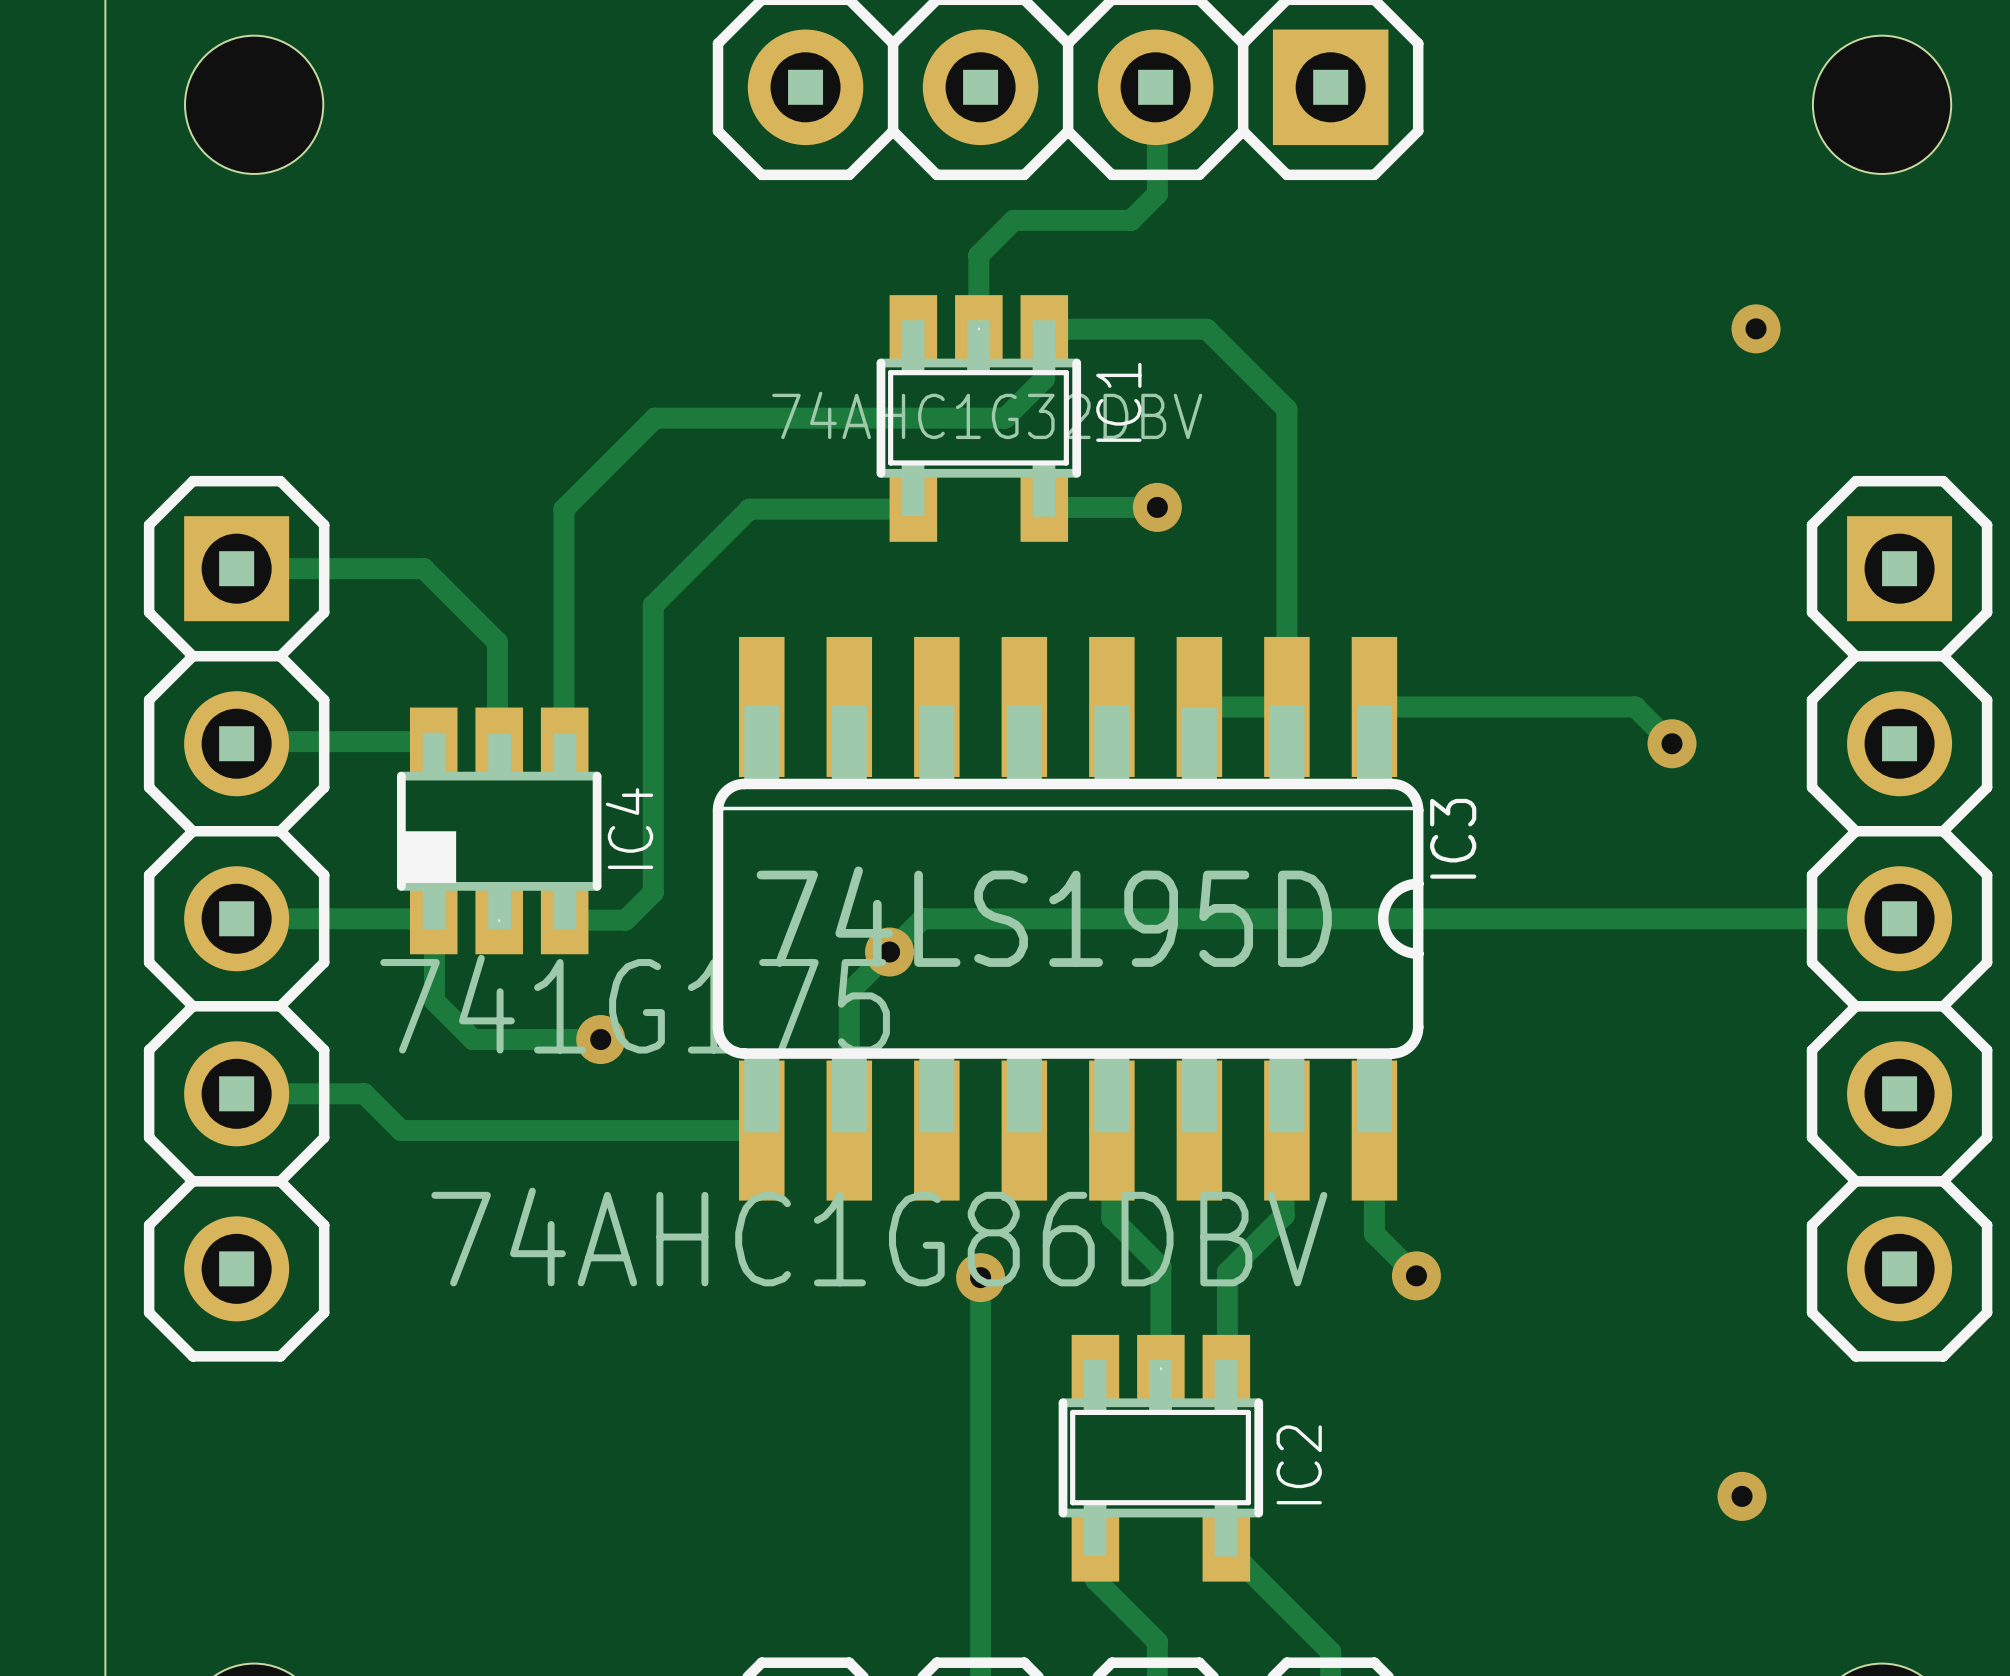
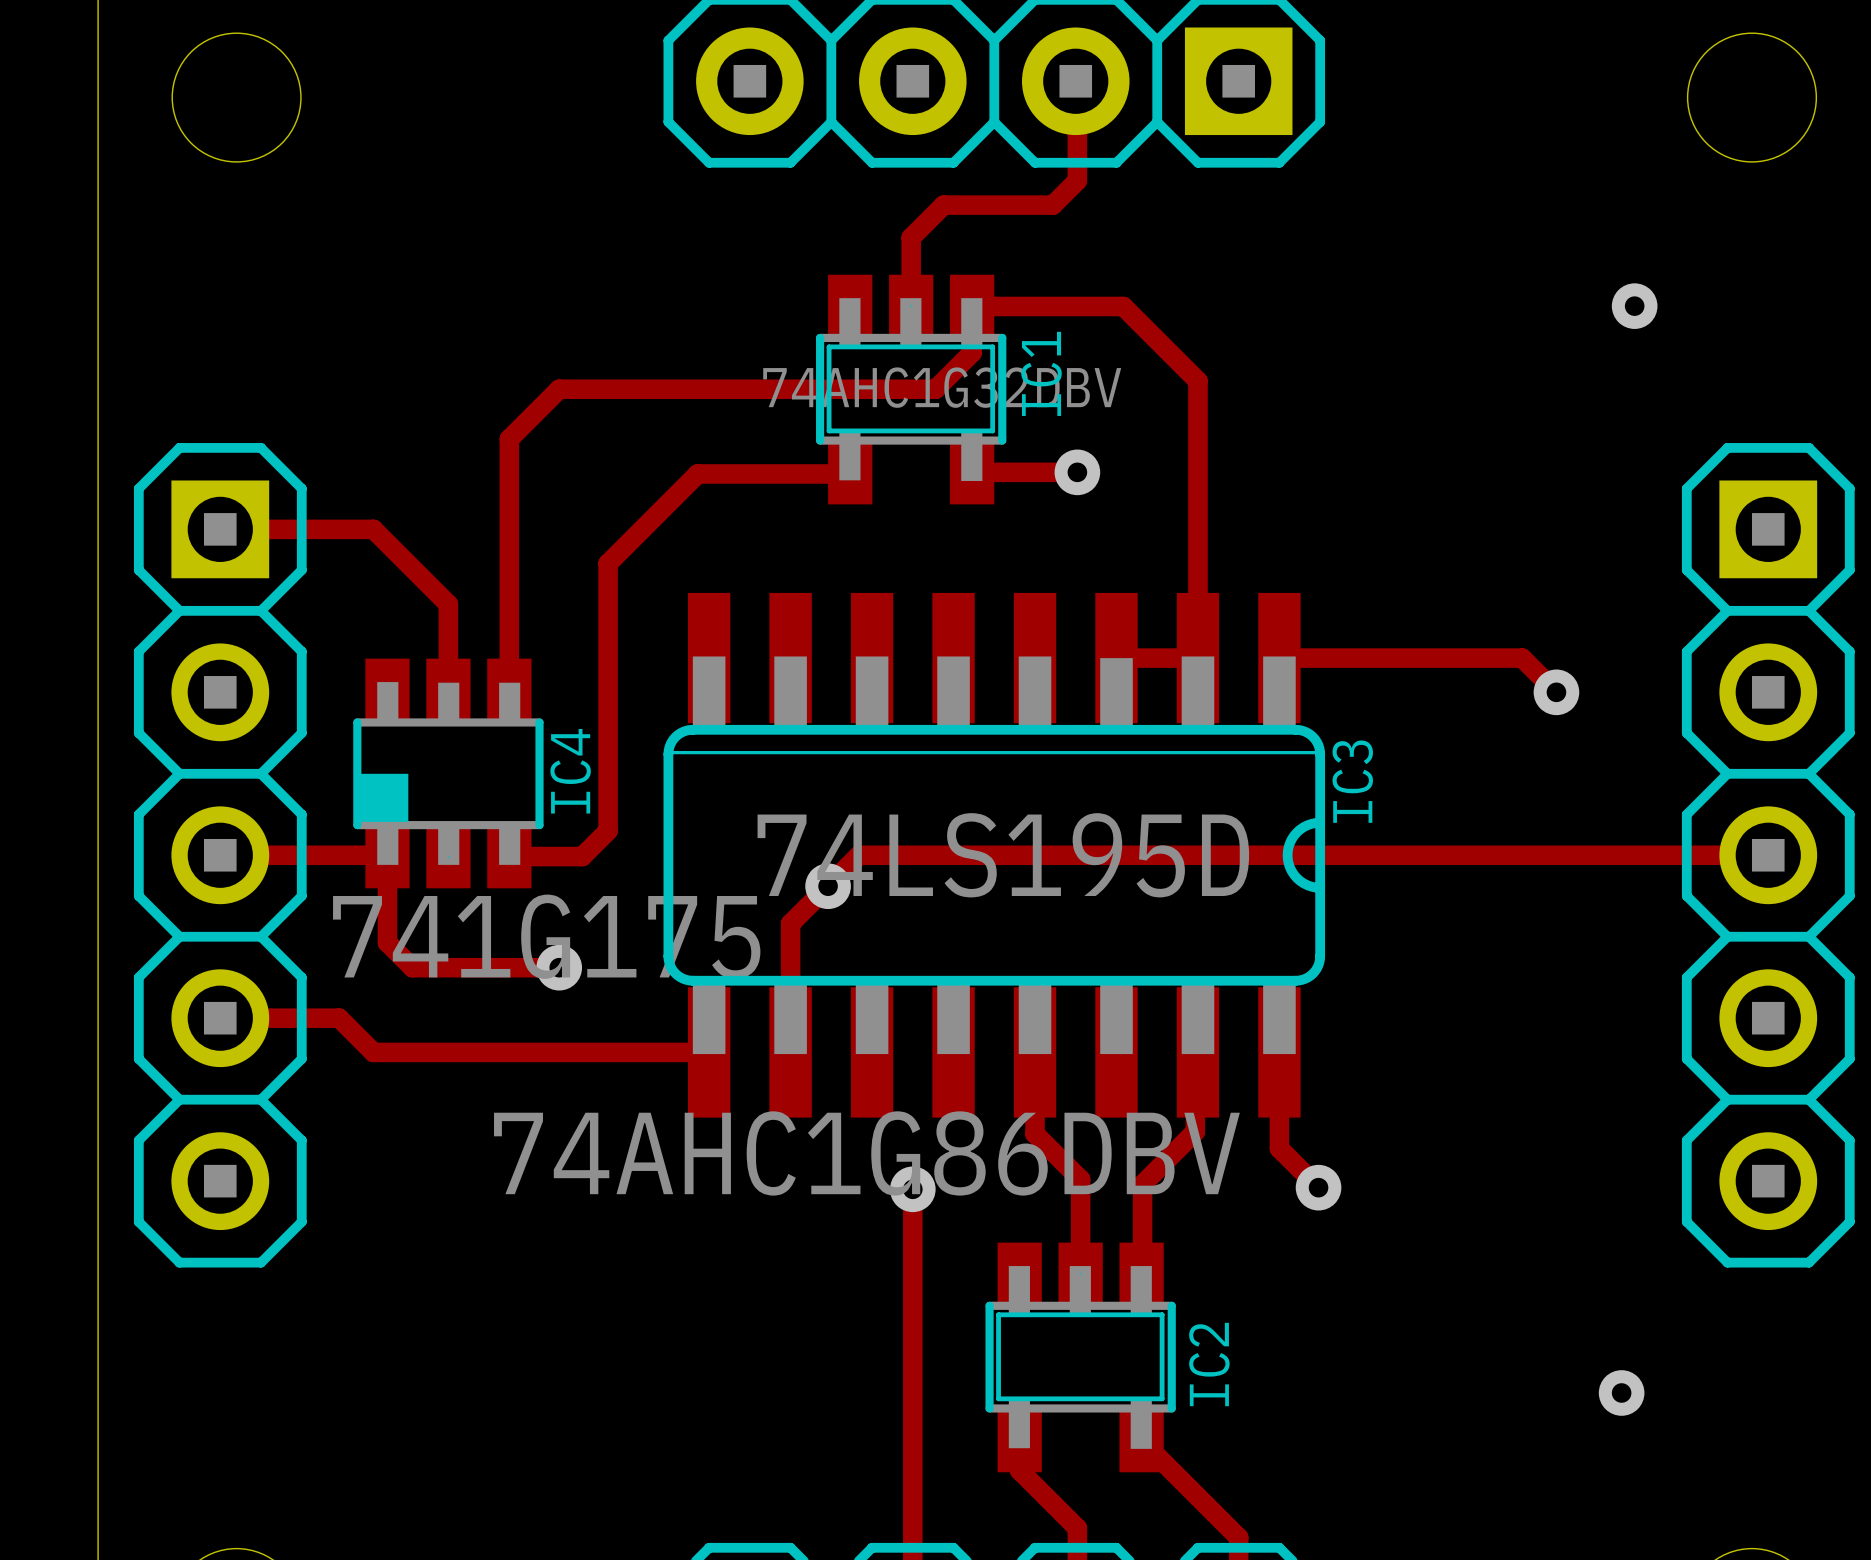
track: (655, 418) (563, 509) (563, 740) -> (609, 389) (559, 389) (509, 439) (509, 690)
track: (401, 568) (423, 568) (497, 642) (497, 739) (499, 741) -> (373, 529) (448, 604) (448, 690)
track: (433, 741) (238, 741) (236, 743) -> none
IC4 position: (499, 830) -> (448, 773)
track: (434, 920) (434, 1001) (472, 1039) -> (386, 855) (387, 942) (412, 967) (440, 967)

